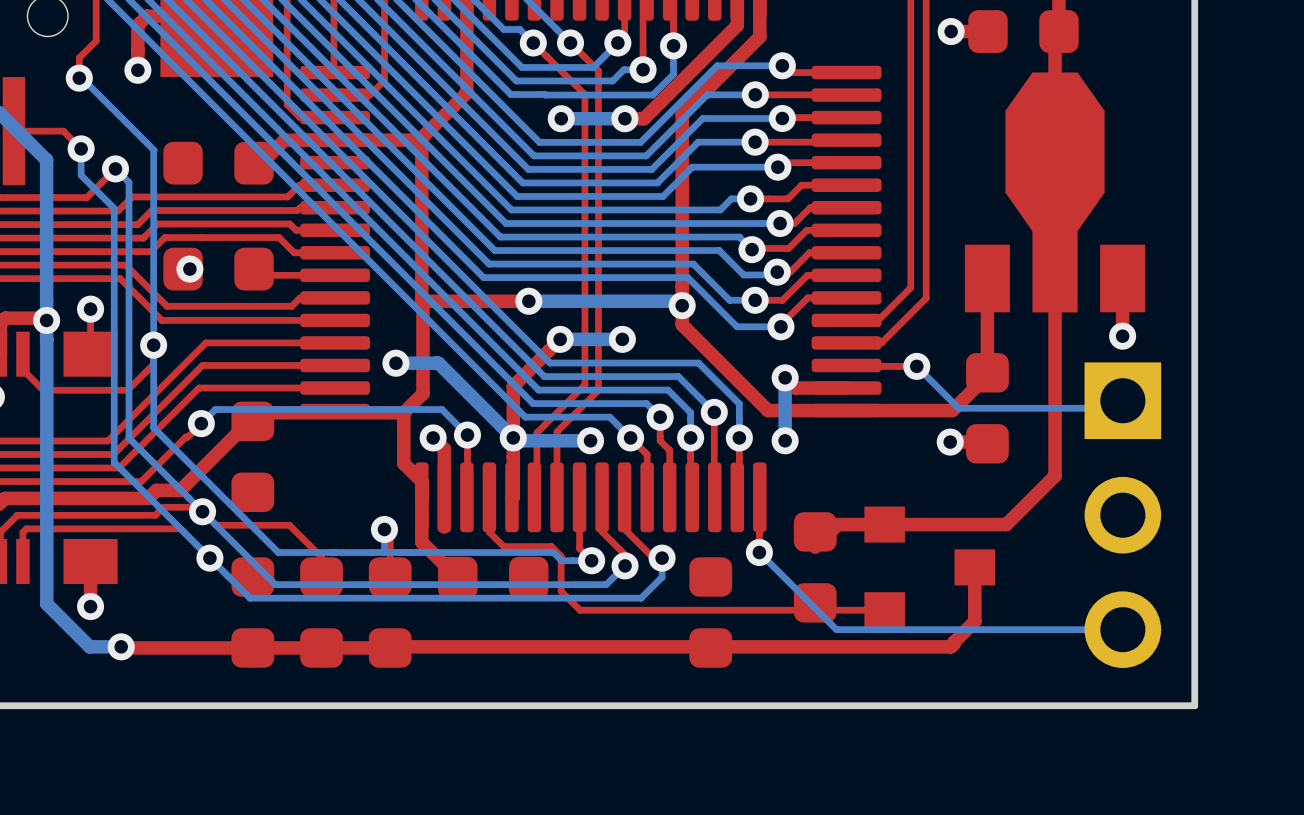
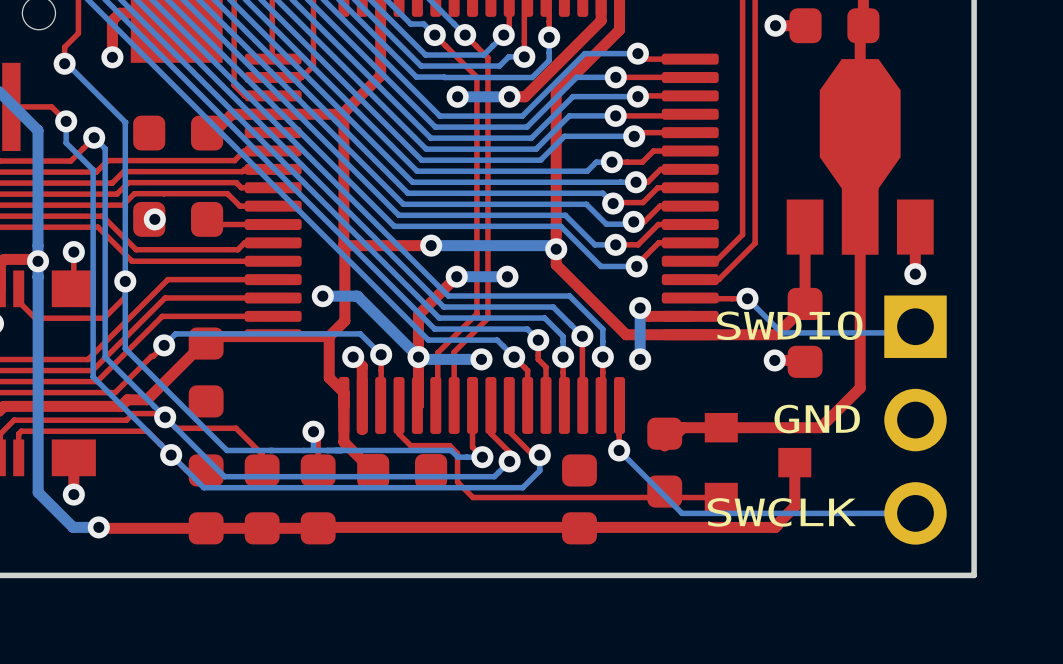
text: none -> SWDIO (789, 325)
text: none -> GND (817, 419)
text: none -> SWCLK (781, 512)

